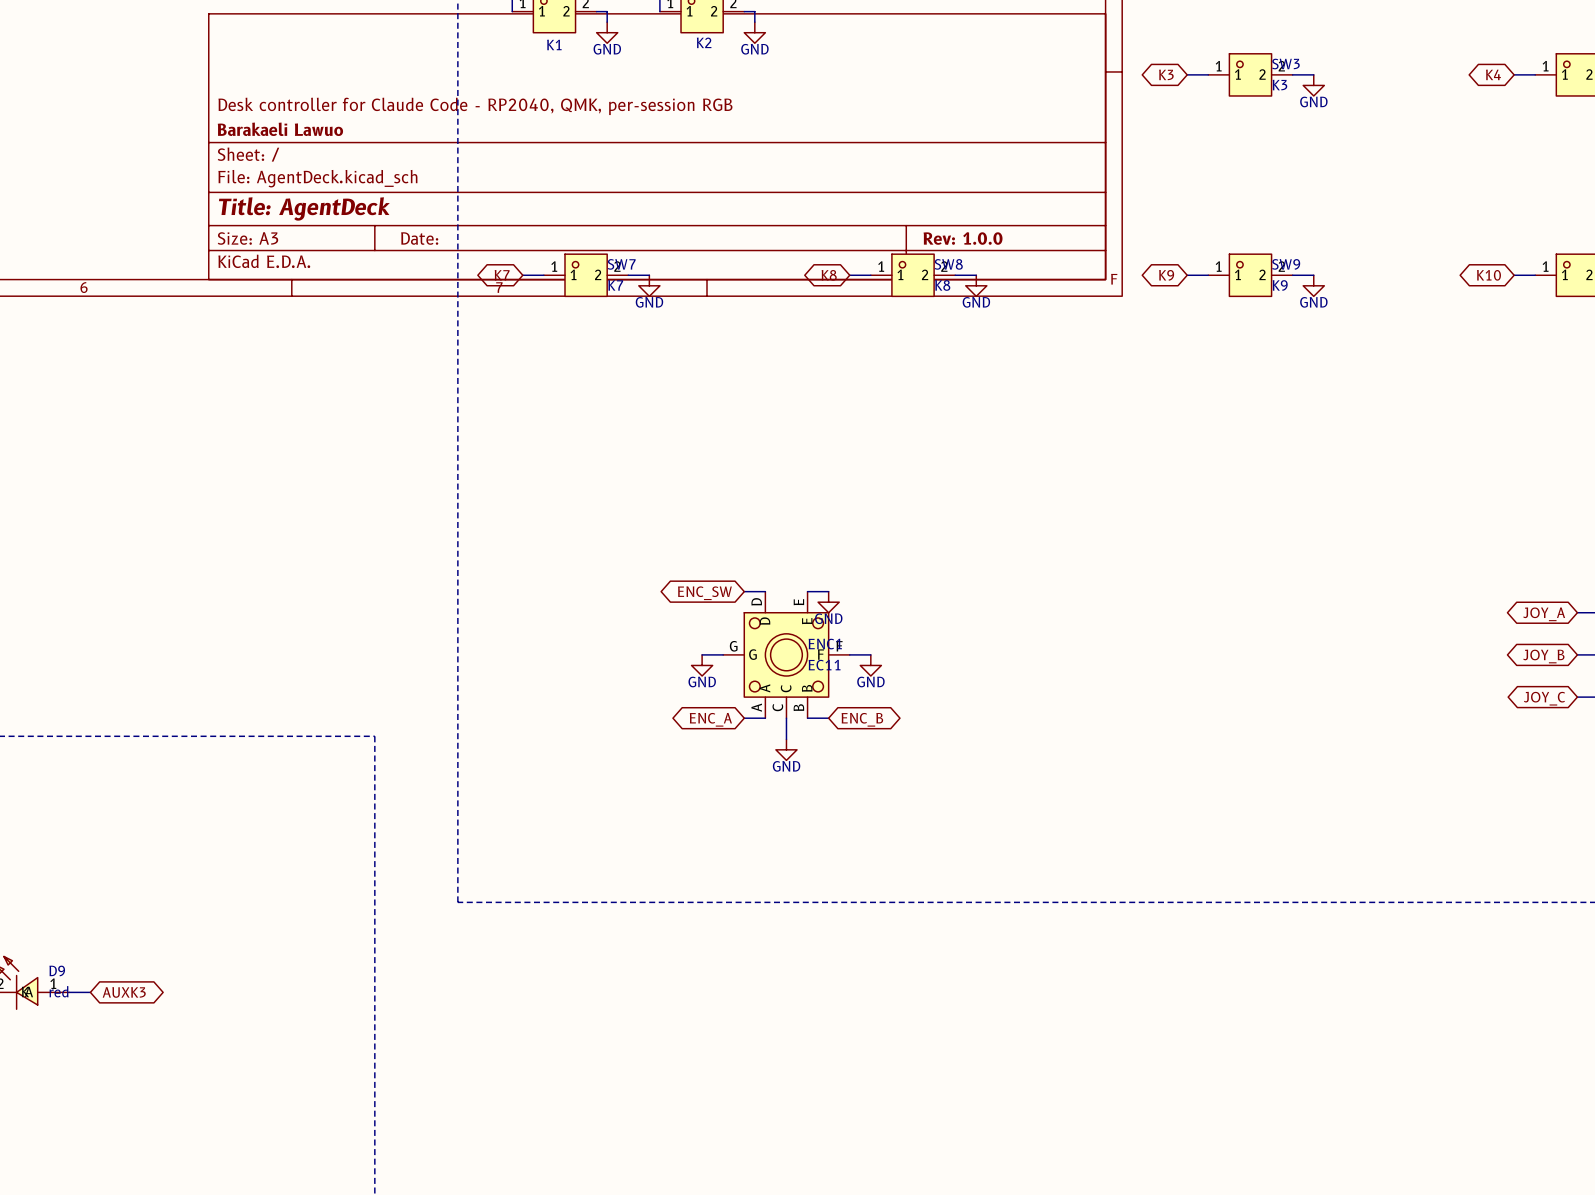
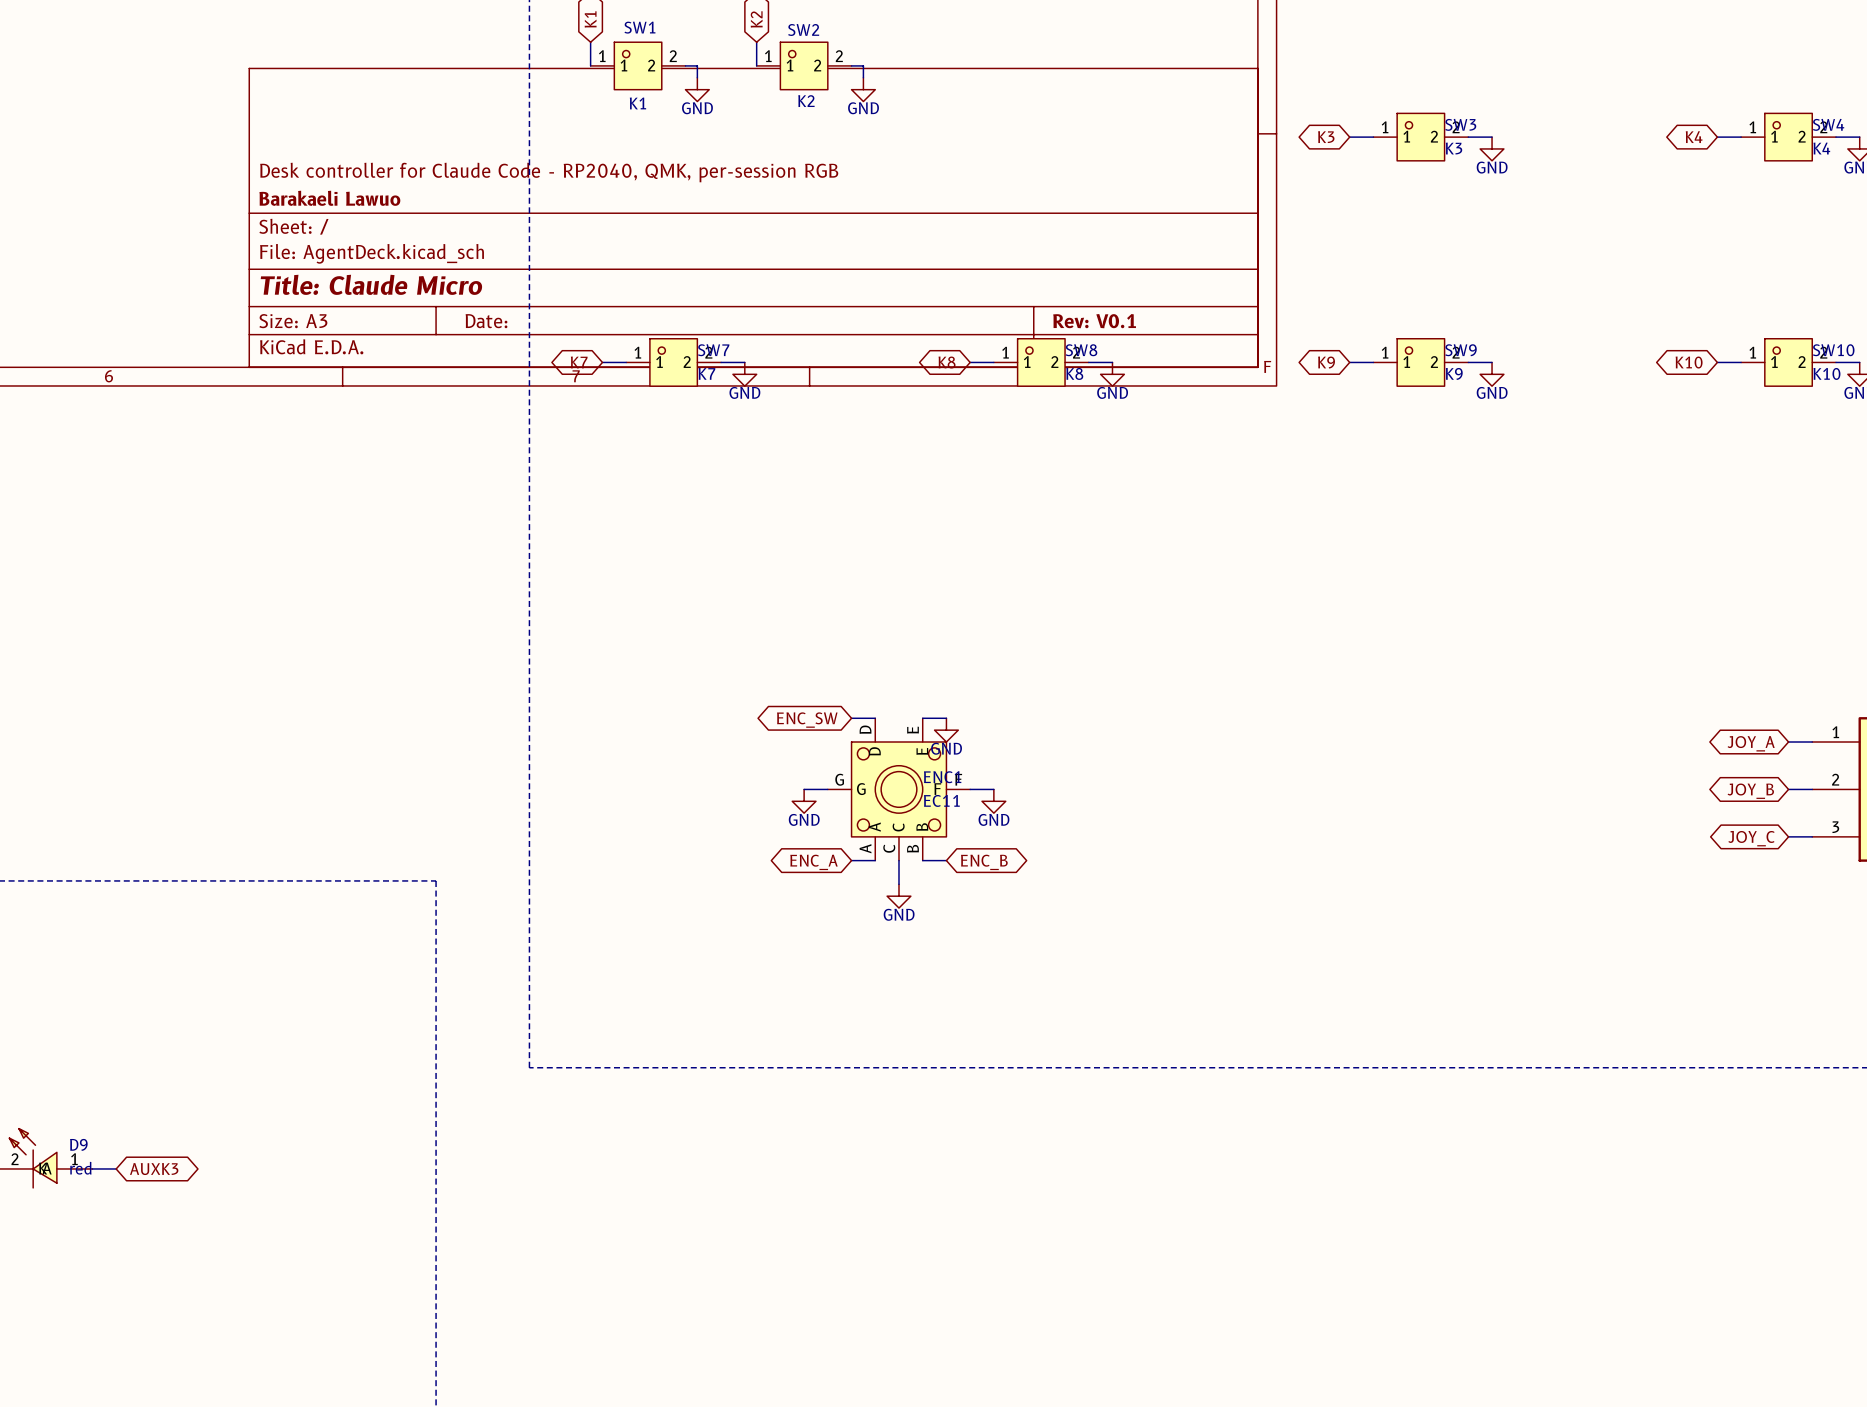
title block: Title: AgentDeck (304, 208) -> Title: Claude Micro (371, 284)
title block: Rev: 1.0.0 (963, 238) -> Rev: V0.1 (1094, 321)

